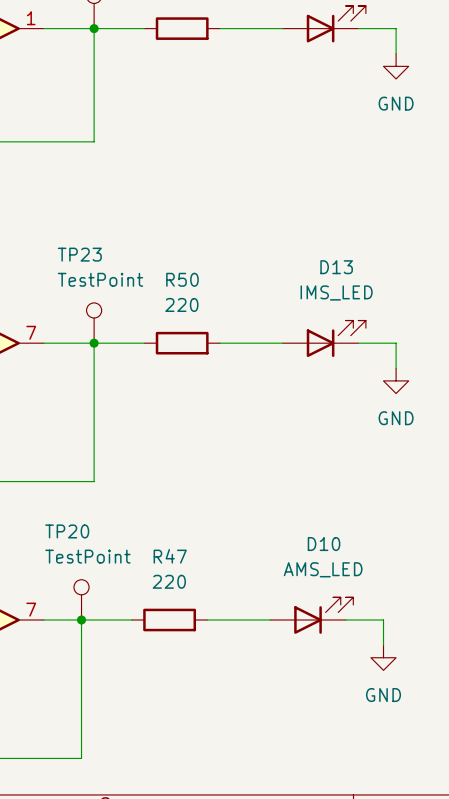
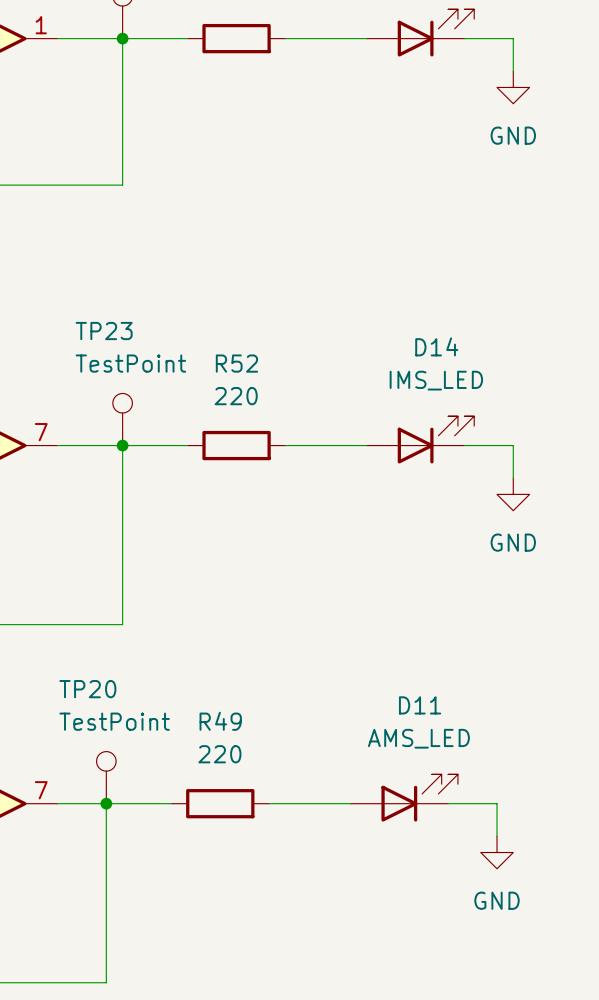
D13 name: D13 (336, 267) -> D14 (436, 346)
R50 name: R50 (182, 279) -> R52 (236, 363)
D10 name: D10 (324, 544) -> D11 (420, 705)
R47 name: R47 (170, 556) -> R49 (220, 721)

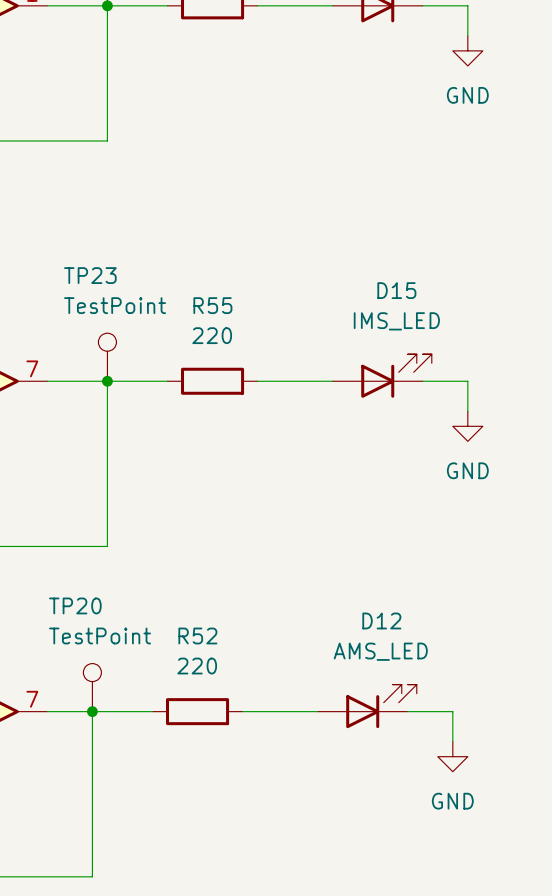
D14 name: D14 (436, 346) -> D15 (396, 290)
R52 name: R52 (236, 363) -> R55 (212, 305)
D11 name: D11 (420, 705) -> D12 (381, 620)
R49 name: R49 (220, 721) -> R52 (197, 635)

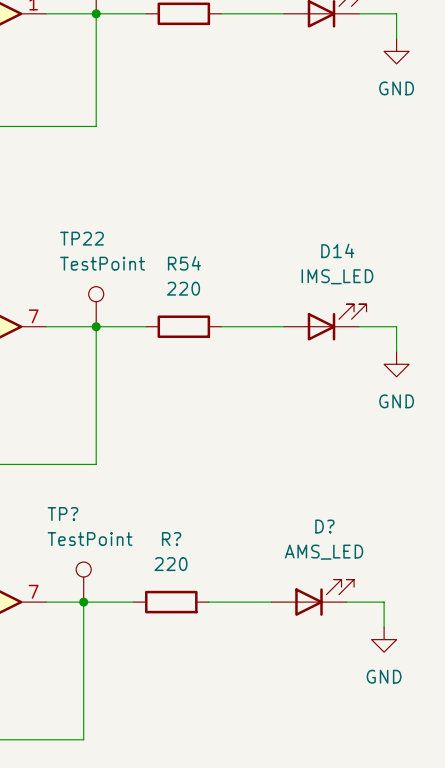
TP23 name: TP23 (90, 275) -> TP22 (81, 238)
D15 name: D15 (396, 290) -> D14 (337, 250)
R55 name: R55 (212, 305) -> R54 (184, 263)
TP20 name: TP20 (75, 605) -> TP? (62, 514)
D12 name: D12 (381, 620) -> D? (324, 526)
R52 name: R52 (197, 635) -> R? (171, 539)

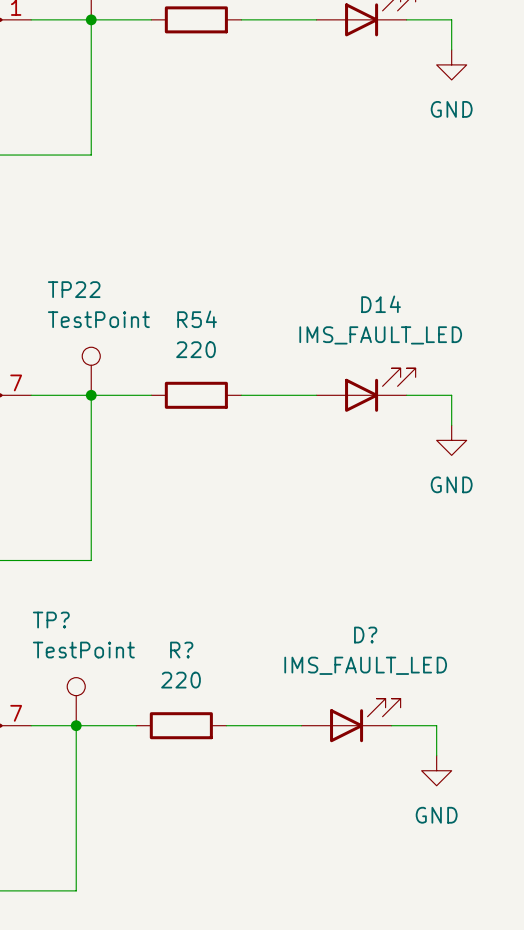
D14 value: IMS_LED (337, 276) -> IMS_FAULT_LED (380, 335)
D? value: AMS_LED (324, 552) -> IMS_FAULT_LED (365, 665)

